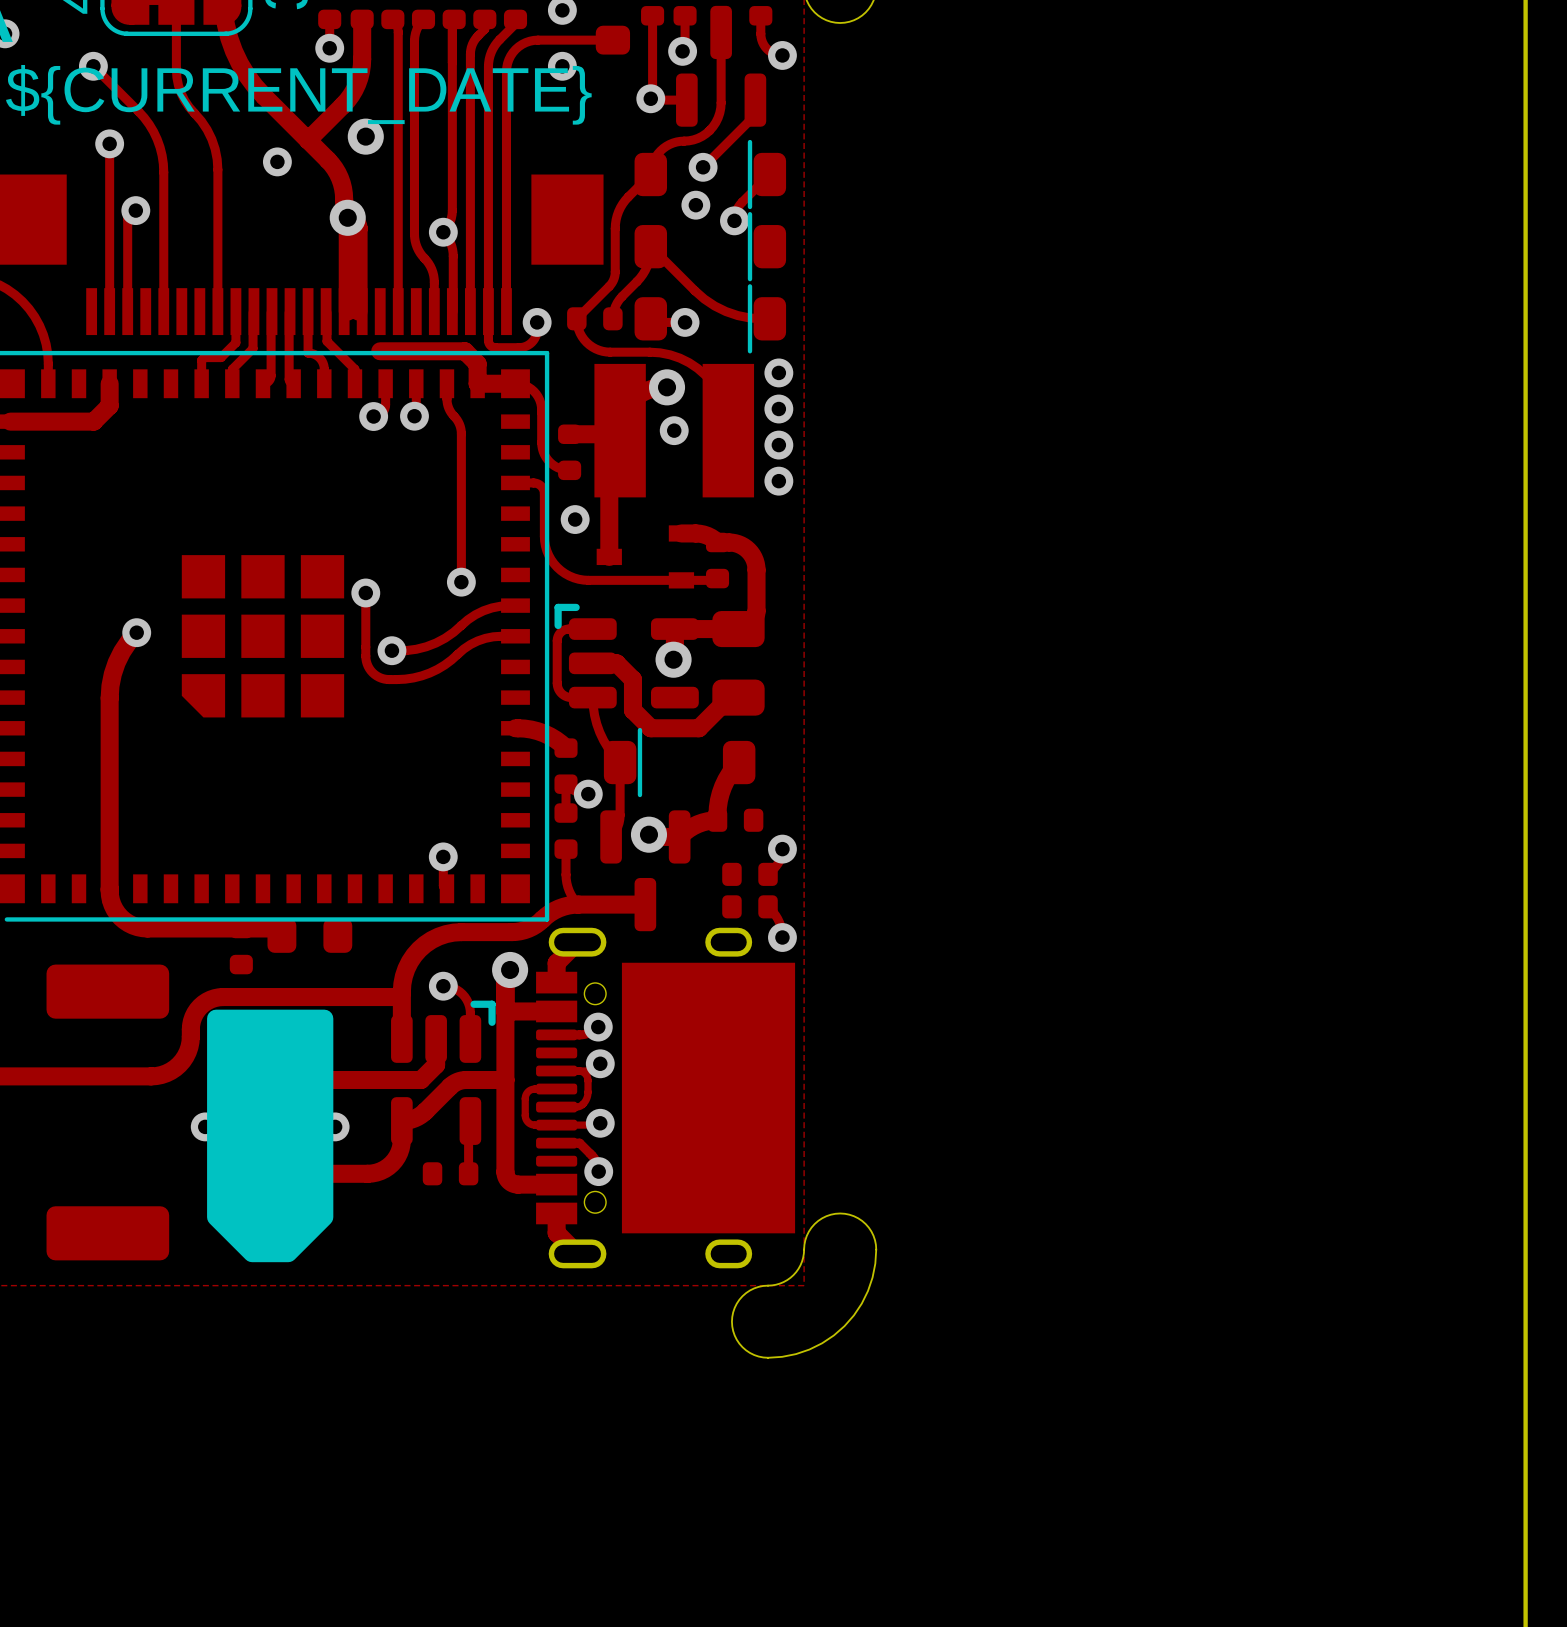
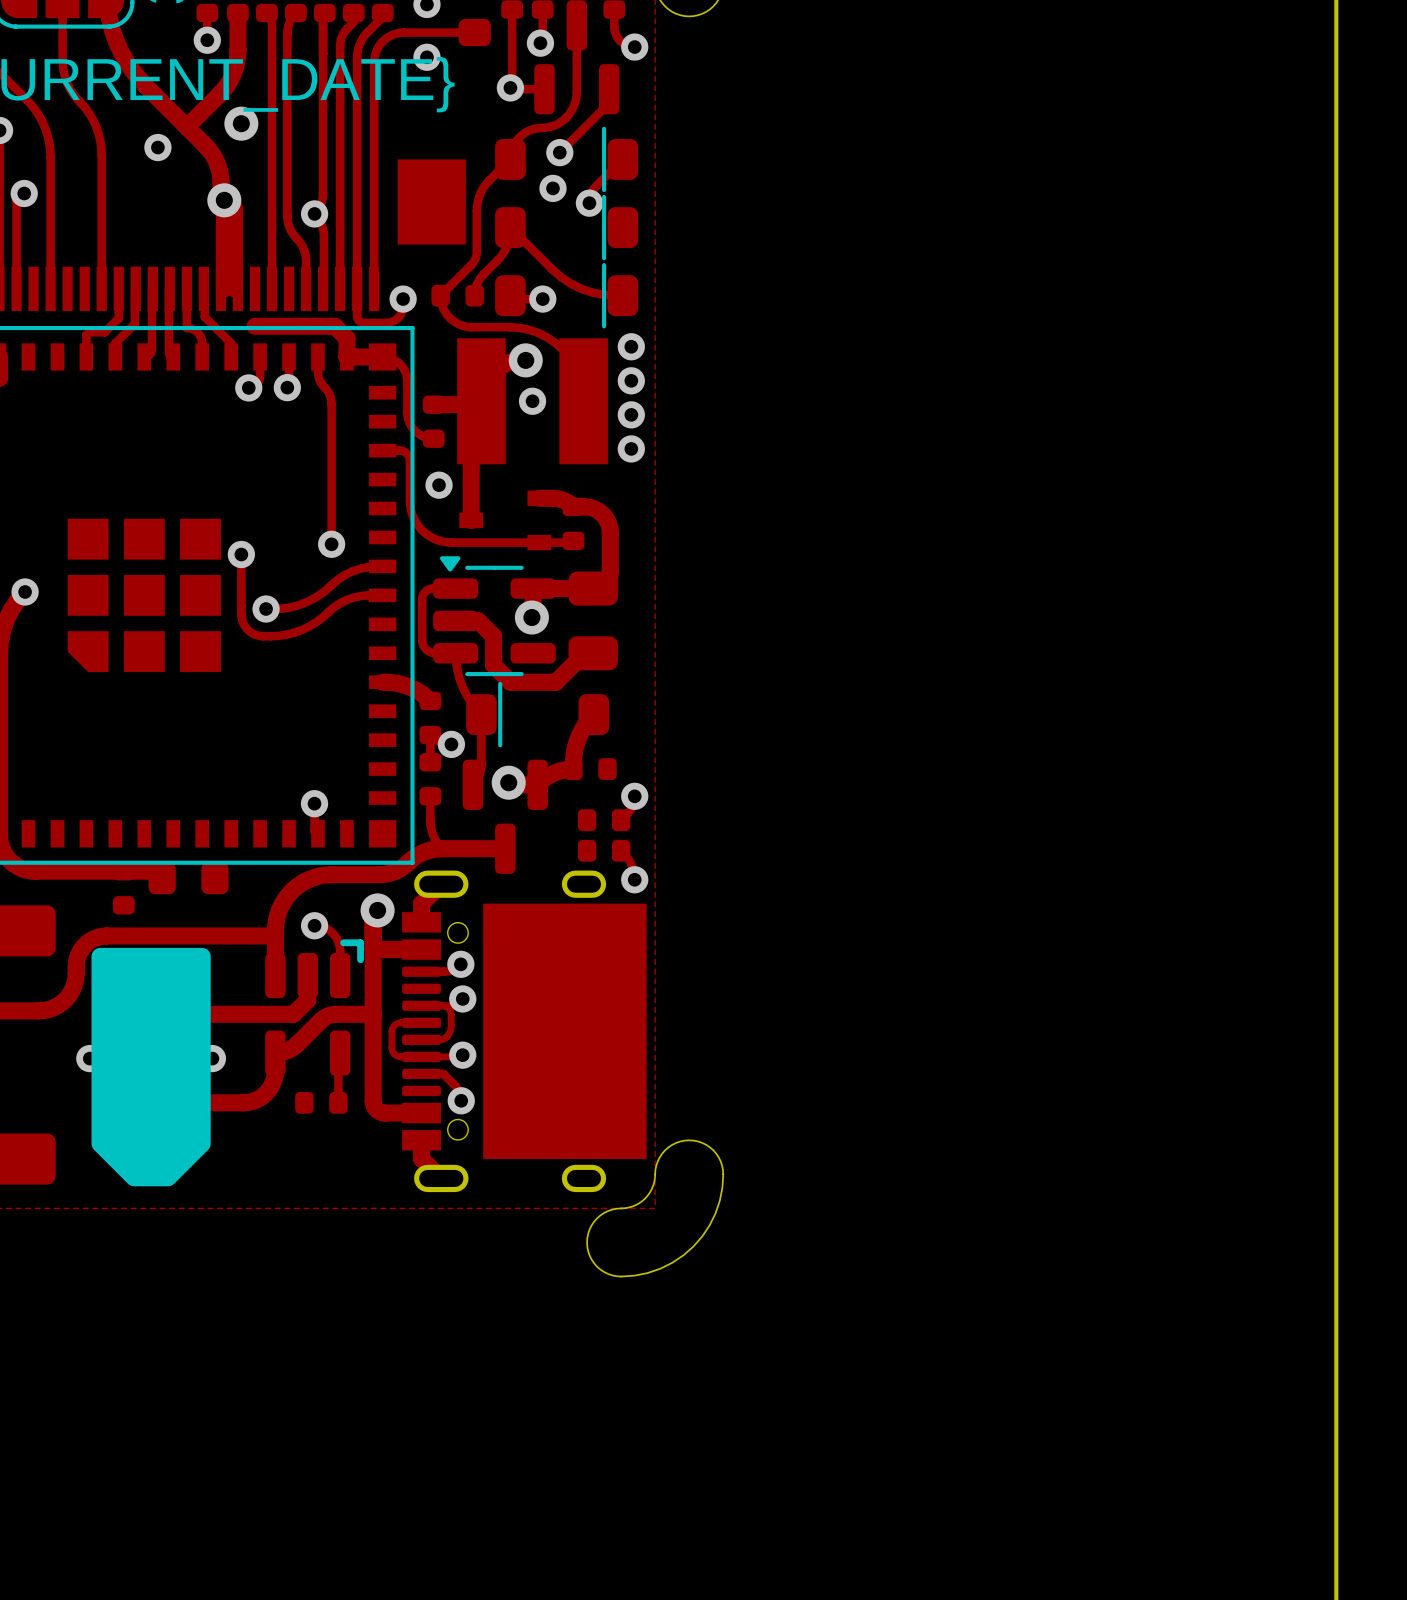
part footprint: [554, 603, 699, 709] -> [433, 556, 556, 677]

